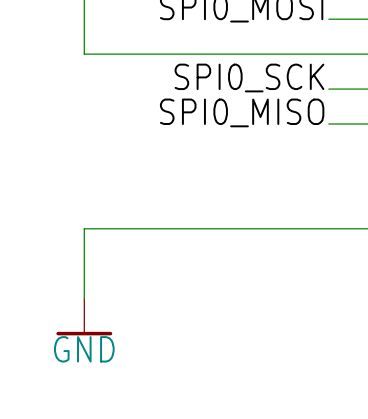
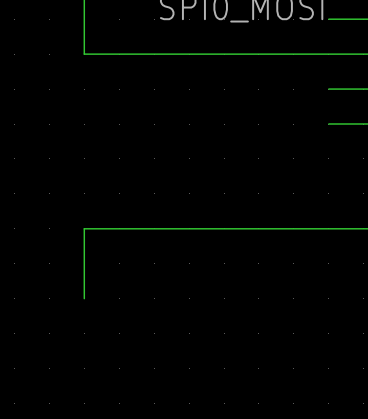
label: SPI0_SCK (249, 78) -> none
label: SPI0_MISO (242, 112) -> none
power symbol: GND (84, 317) -> none

